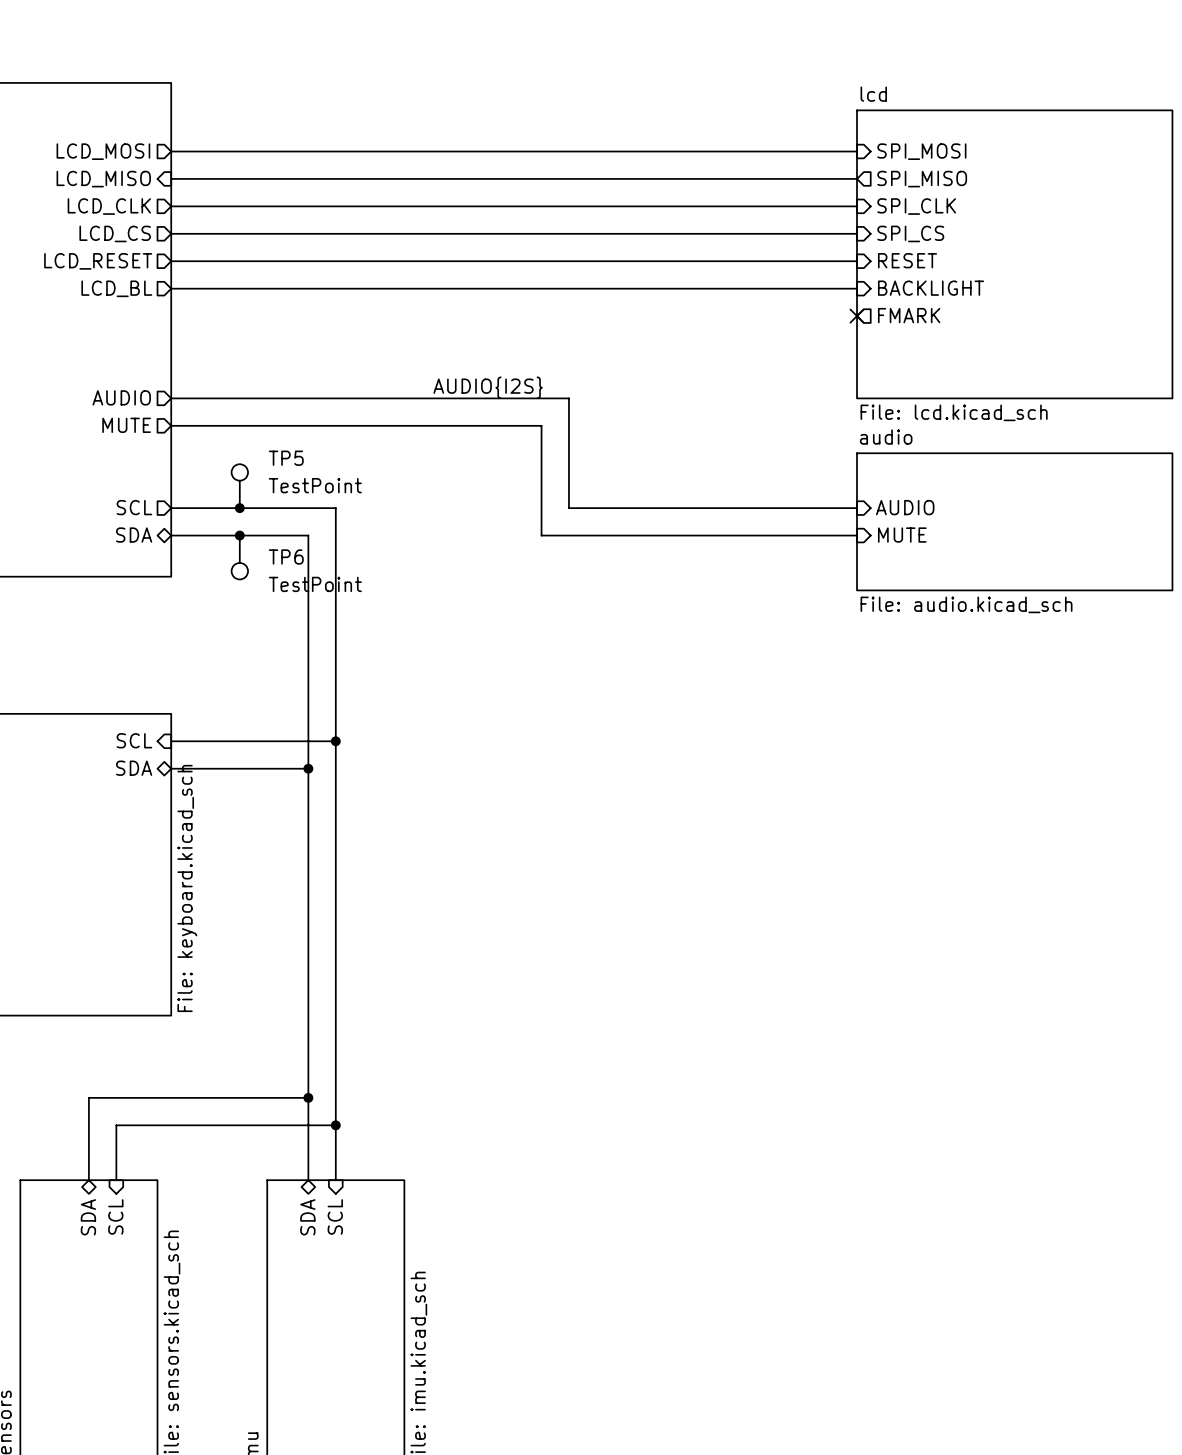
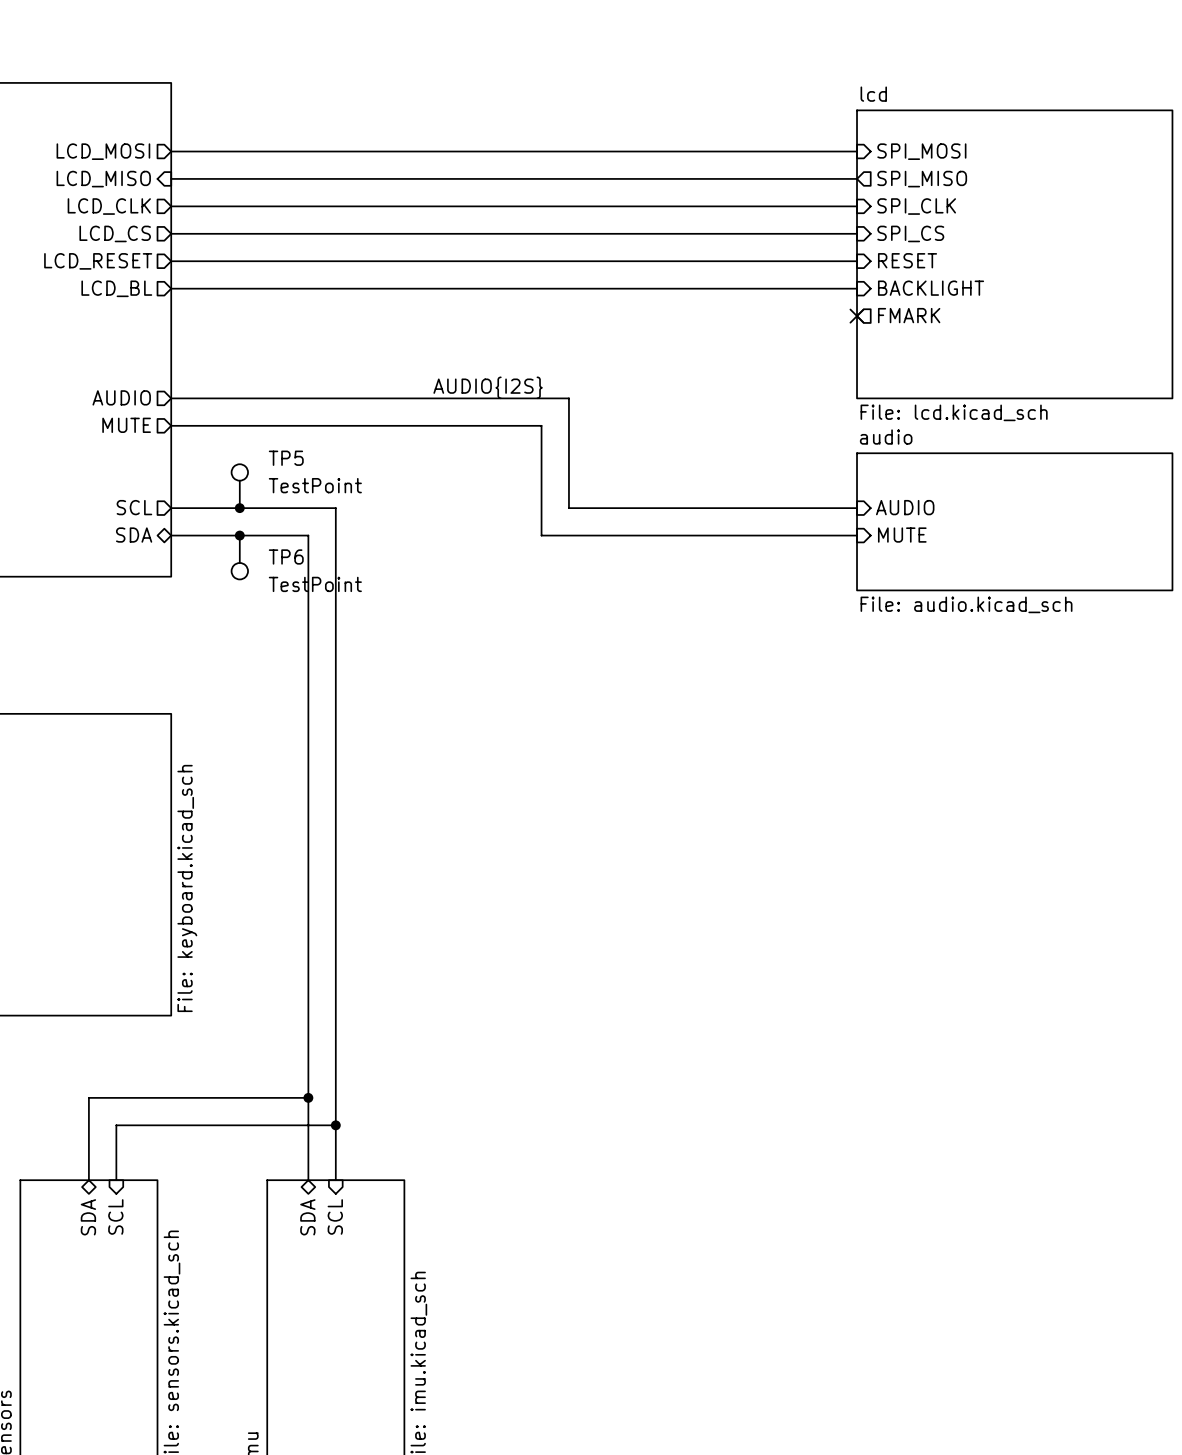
sheet pin: SCL (134, 740) -> none
wire: (171, 741) (335, 741) -> none
junction: (335, 741) -> none
sheet pin: SDA (134, 768) -> none
wire: (171, 768) (308, 768) -> none
junction: (308, 768) -> none

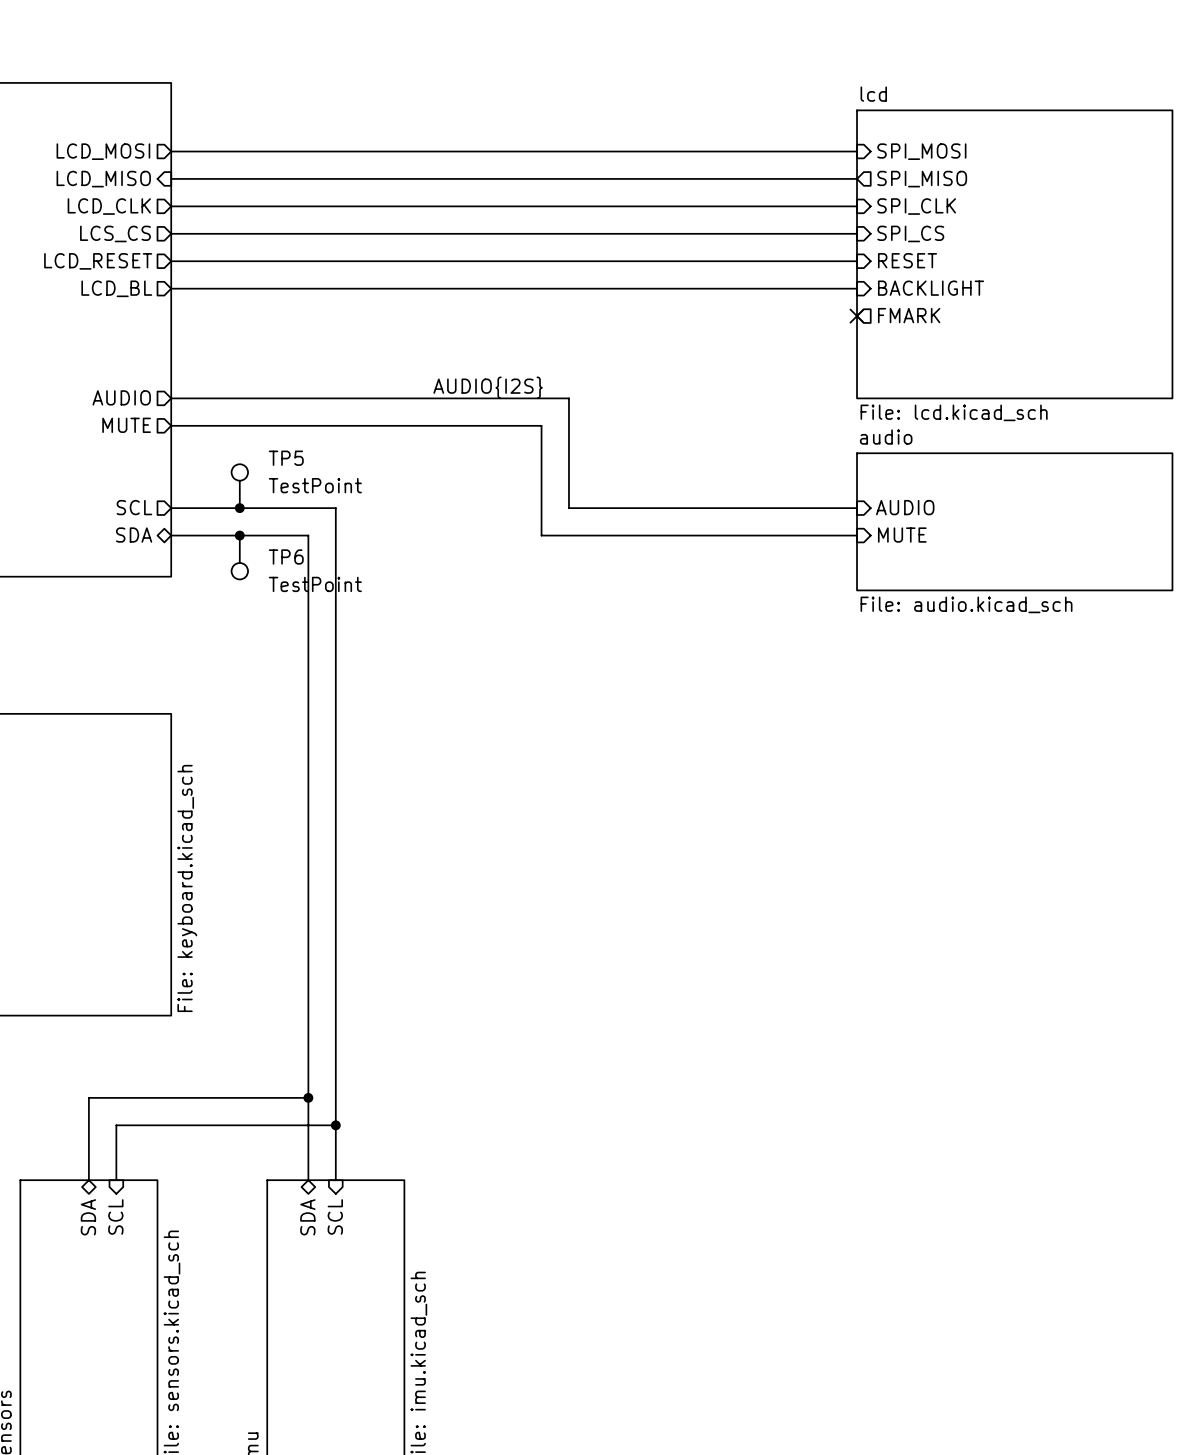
sheet pin: LCD_CS (115, 233) -> LCS_CS (115, 233)

